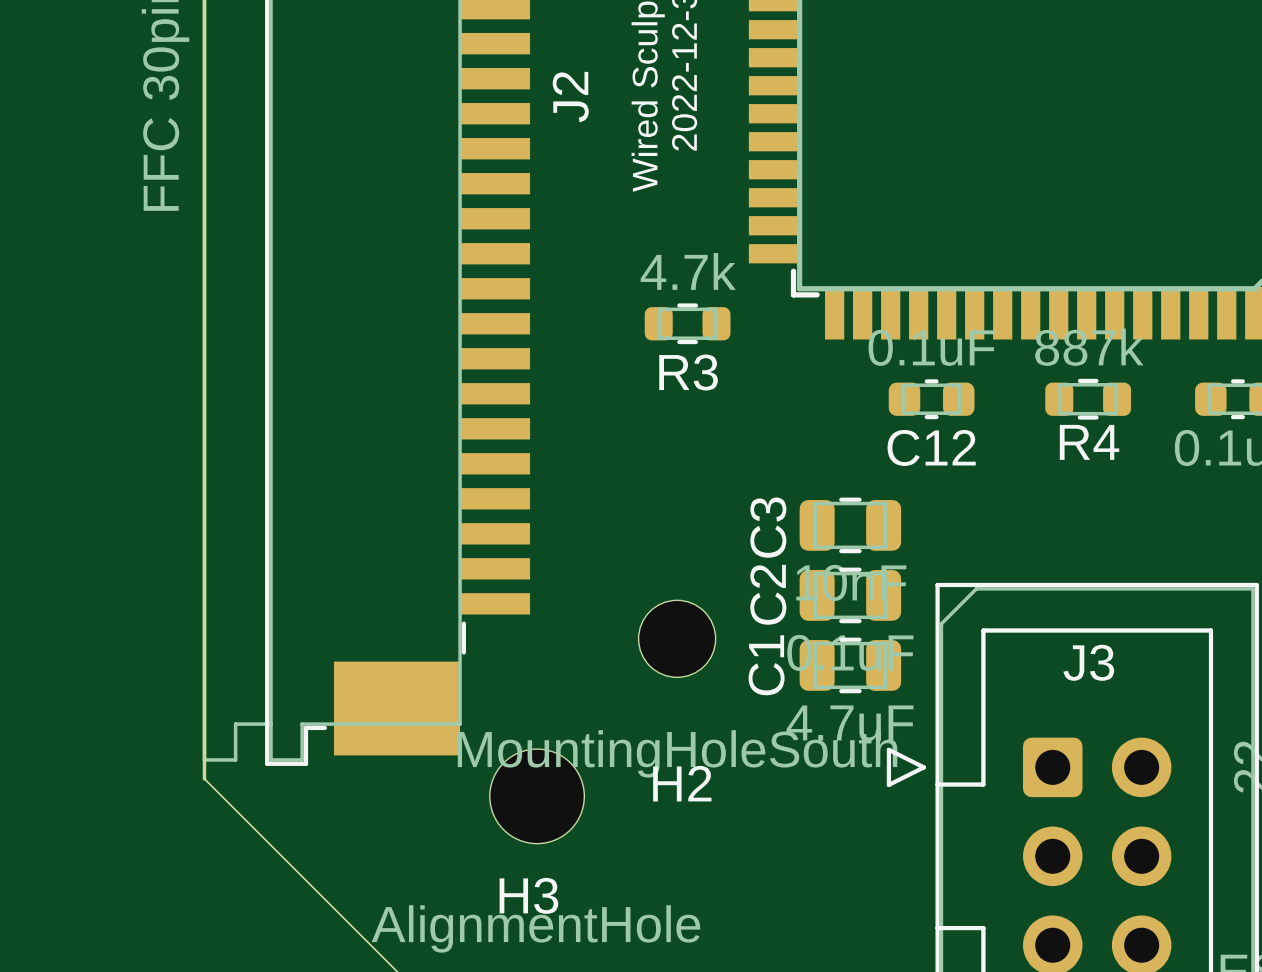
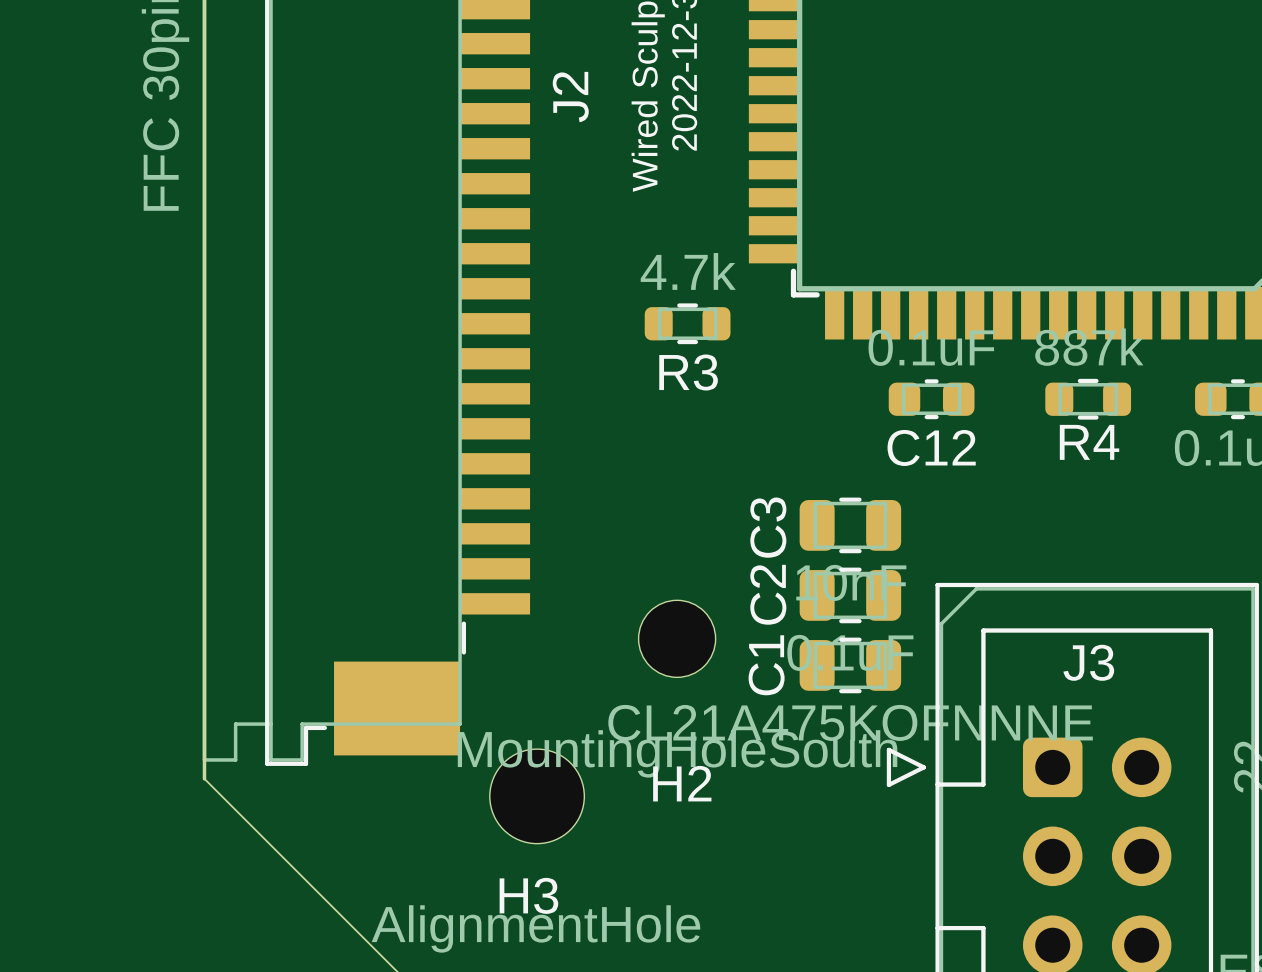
C1 value: 4.7uF (849, 723) -> CL21A475KOFNNNE (850, 722)

